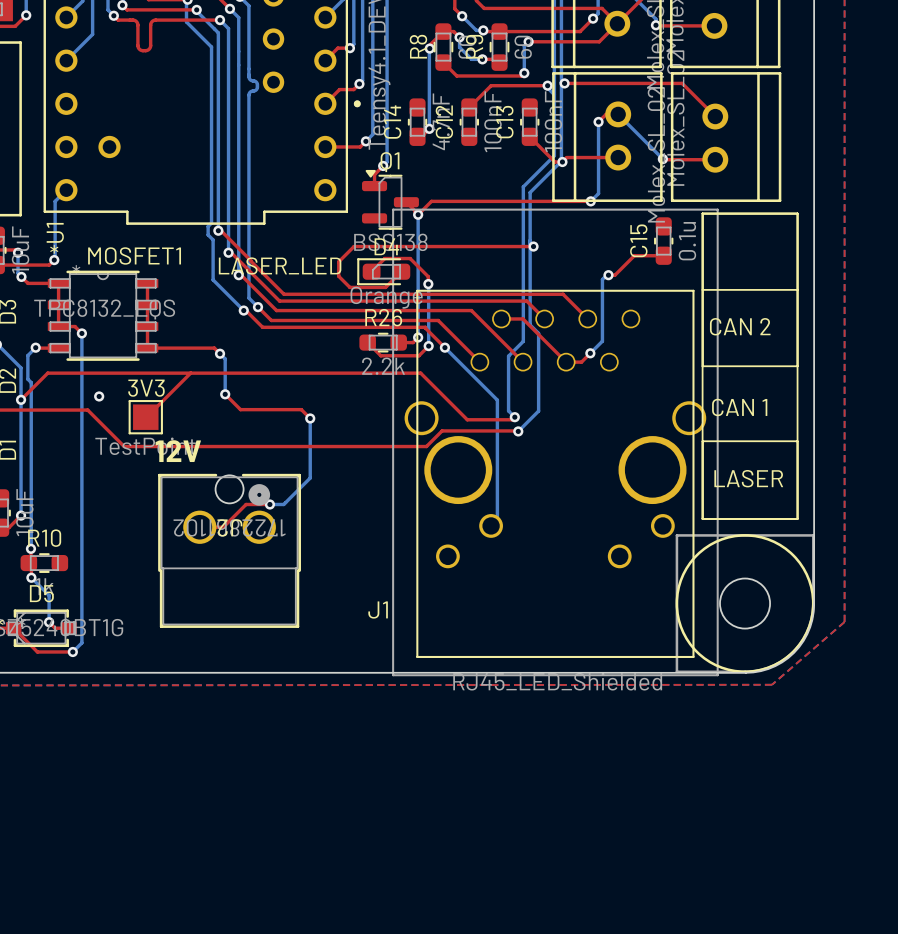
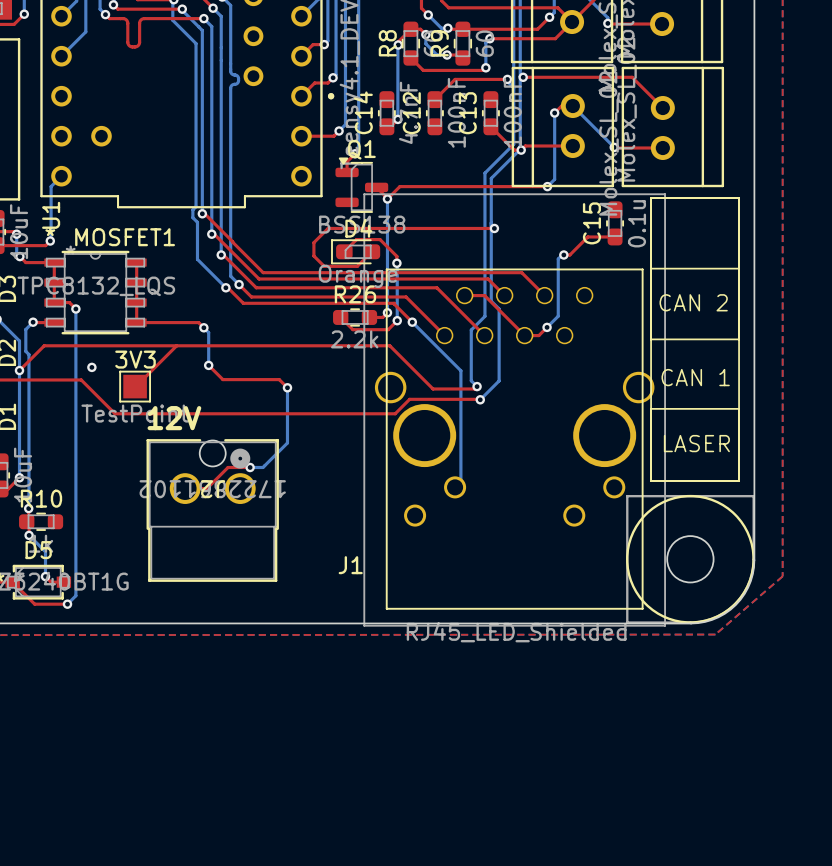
text: LASER_LED (280, 265) -> none

